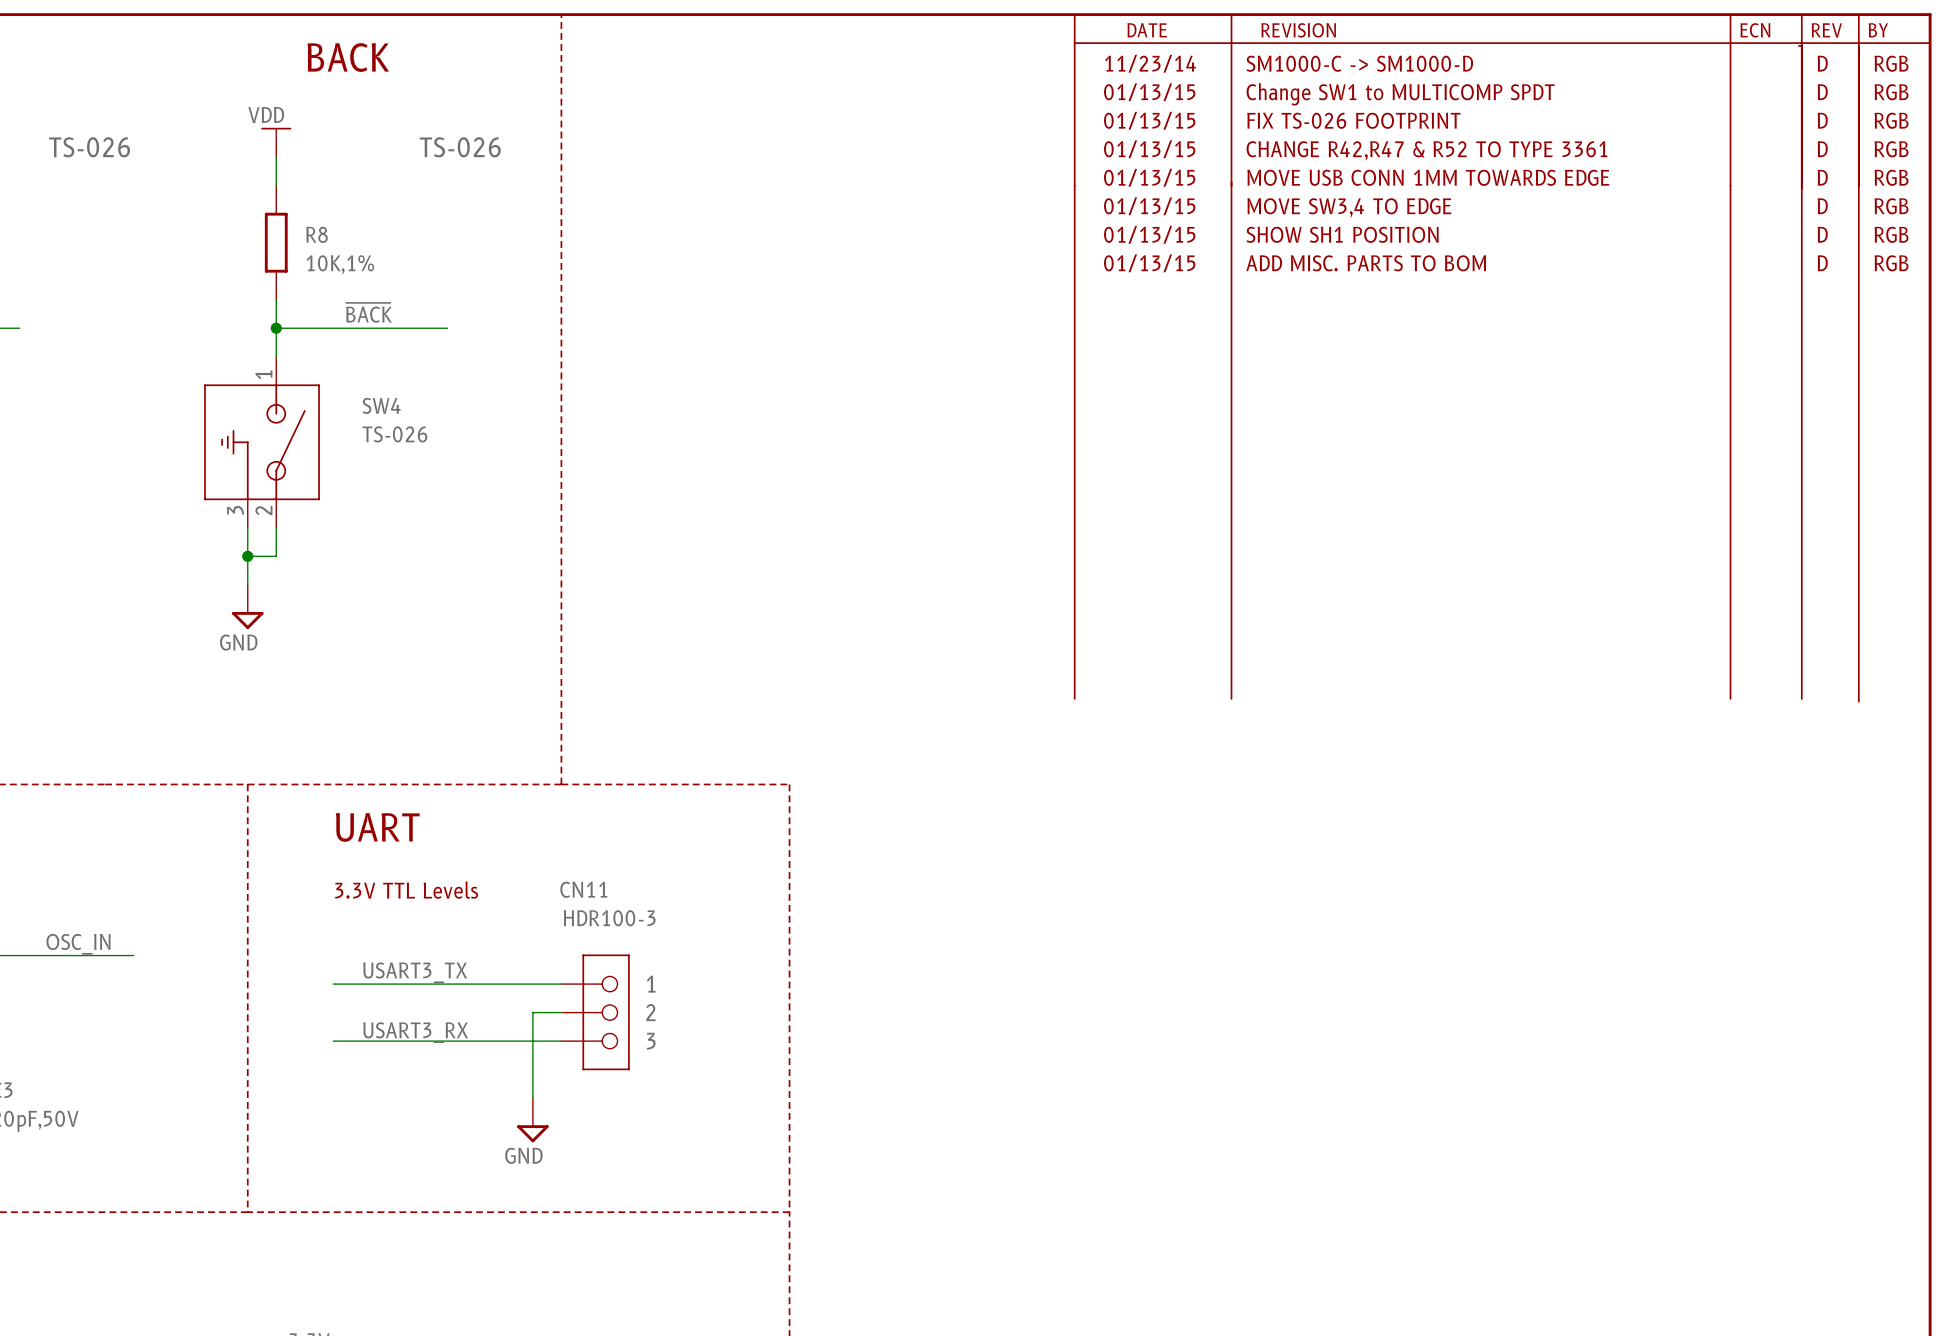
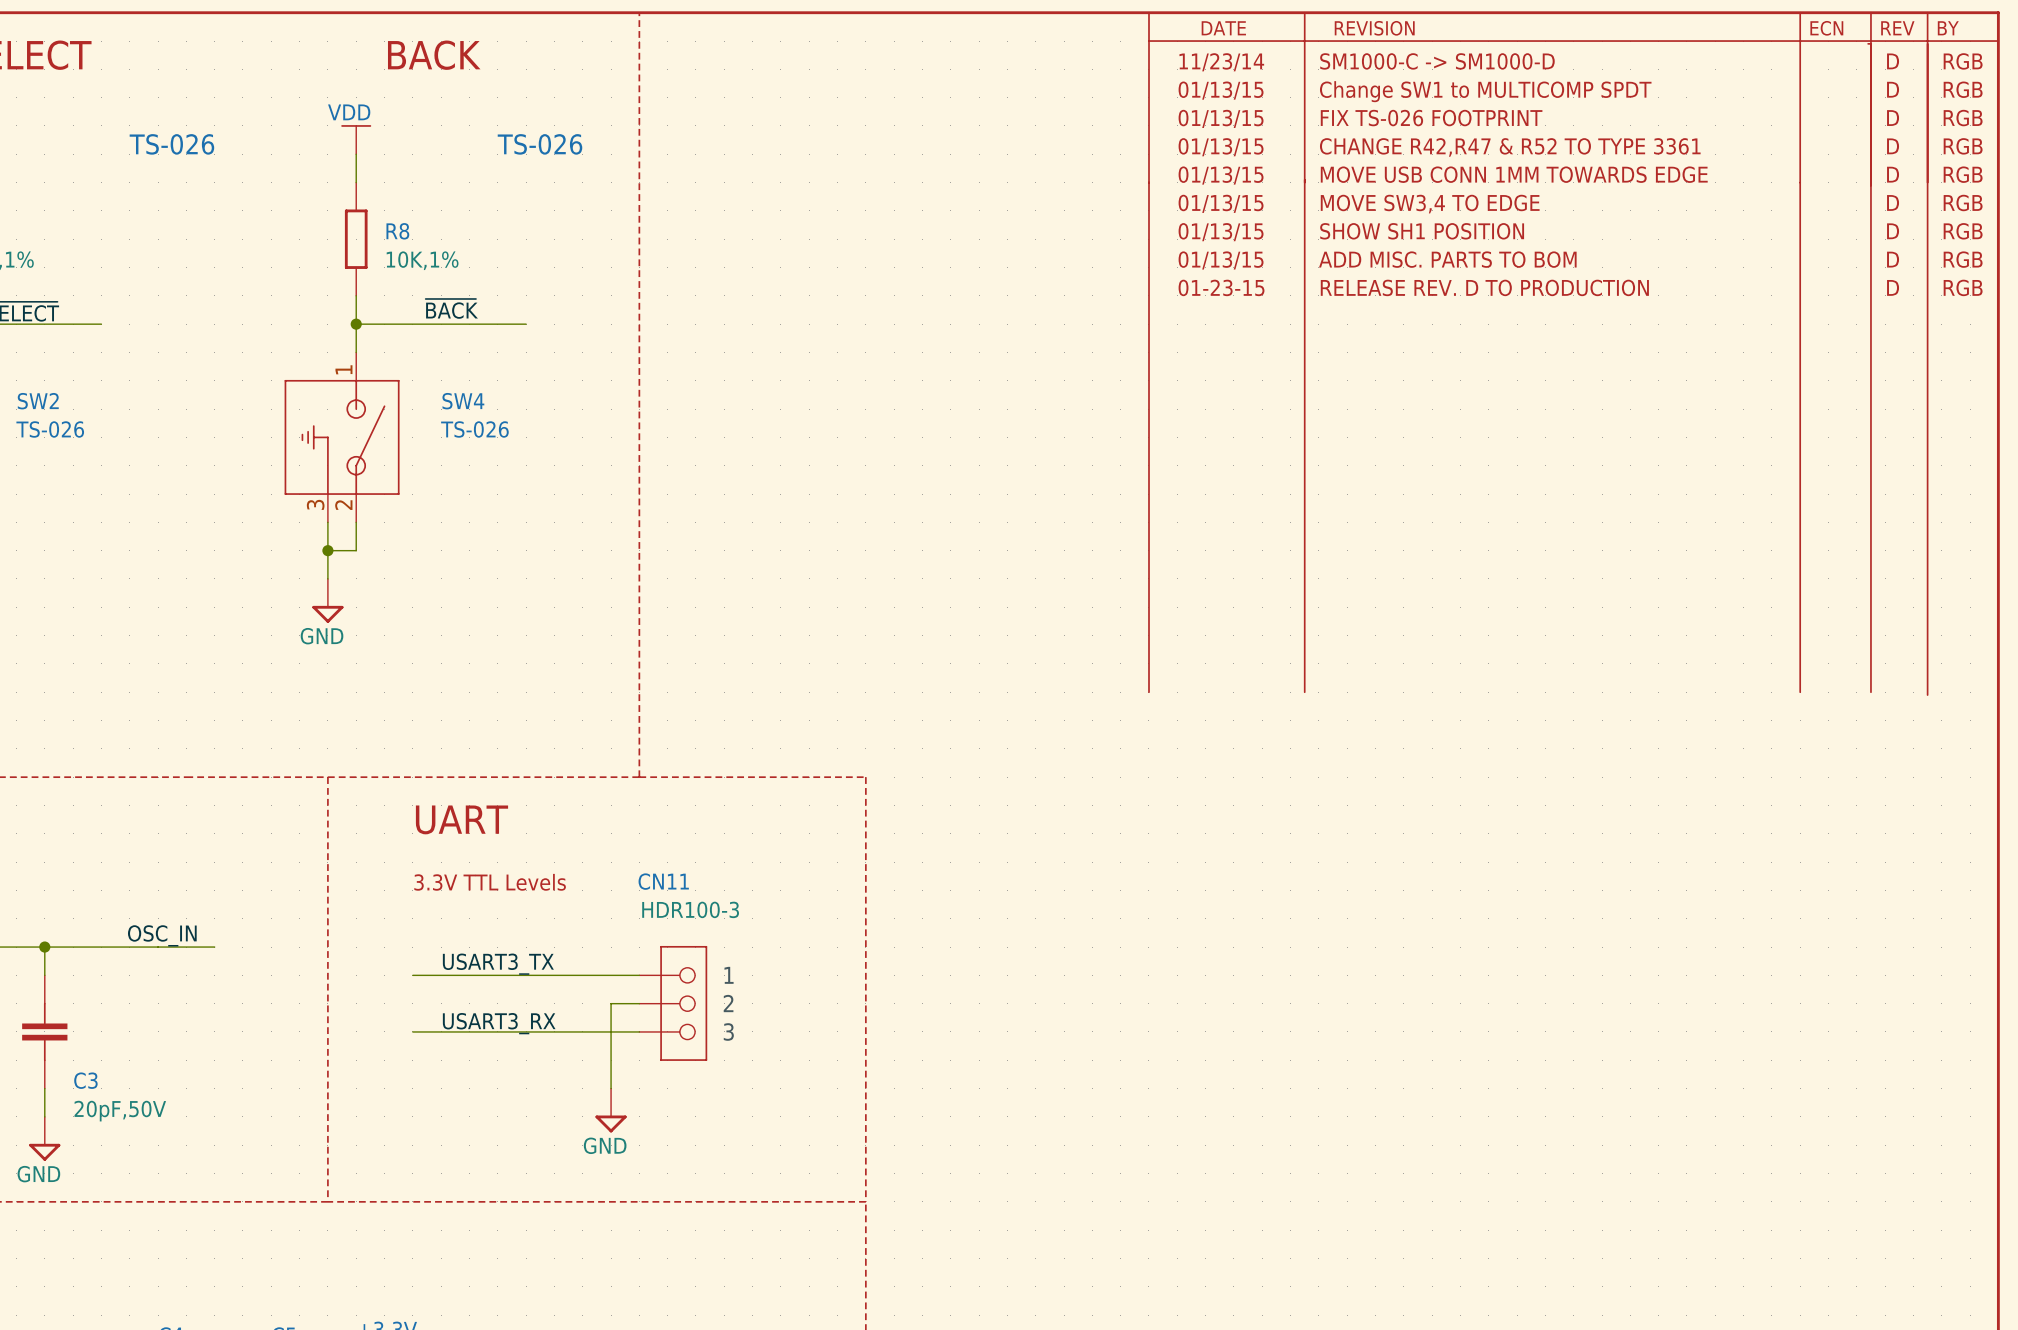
text: none -> 01-23-15 (1221, 287)
text: none -> RELEASE REV. D TO PRODUCTION (1484, 287)
text: none -> D (1893, 287)
text: none -> RGB (1963, 287)

